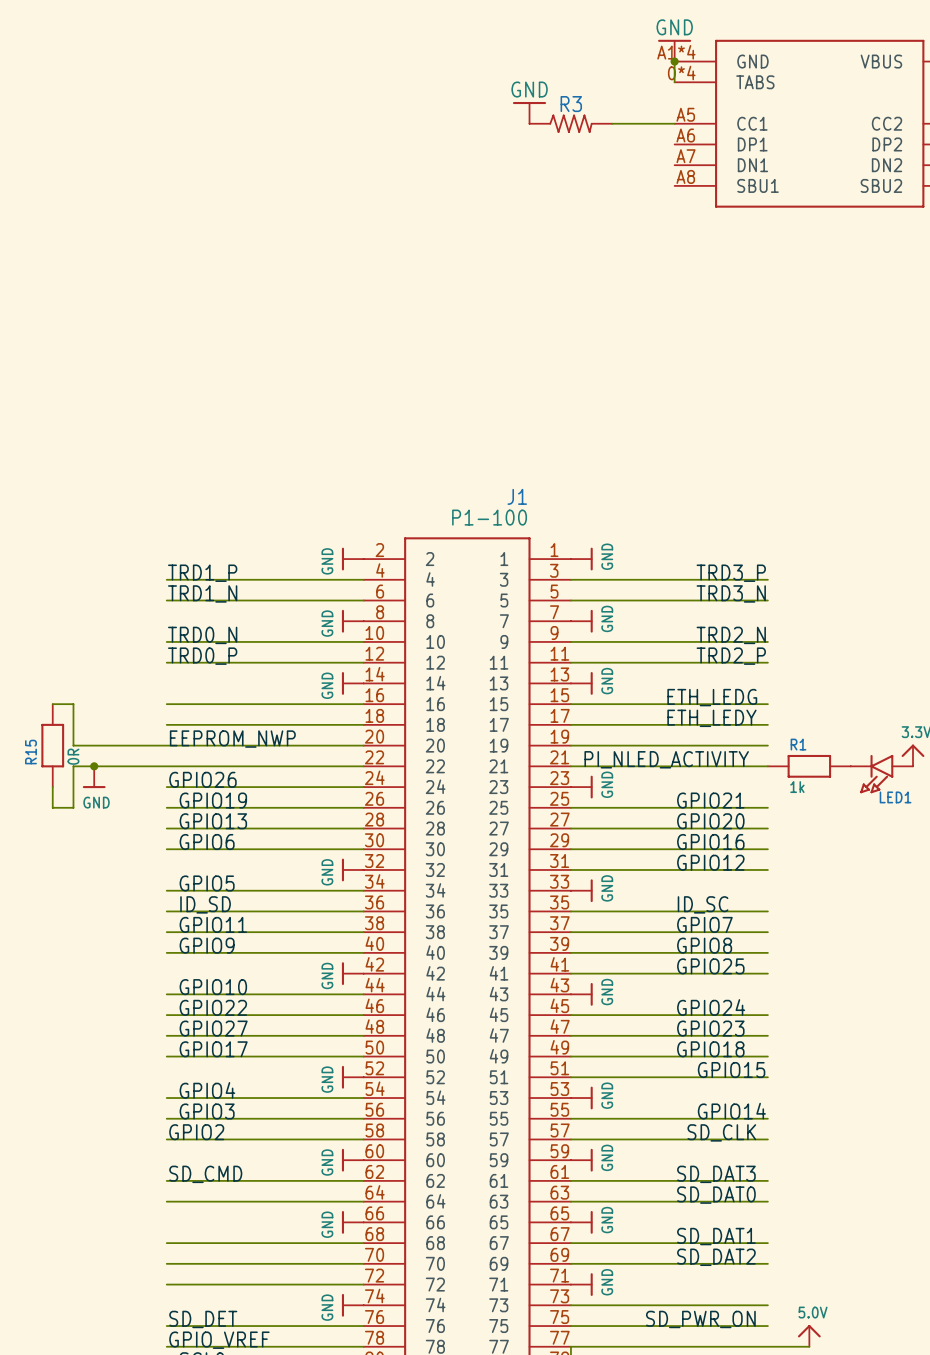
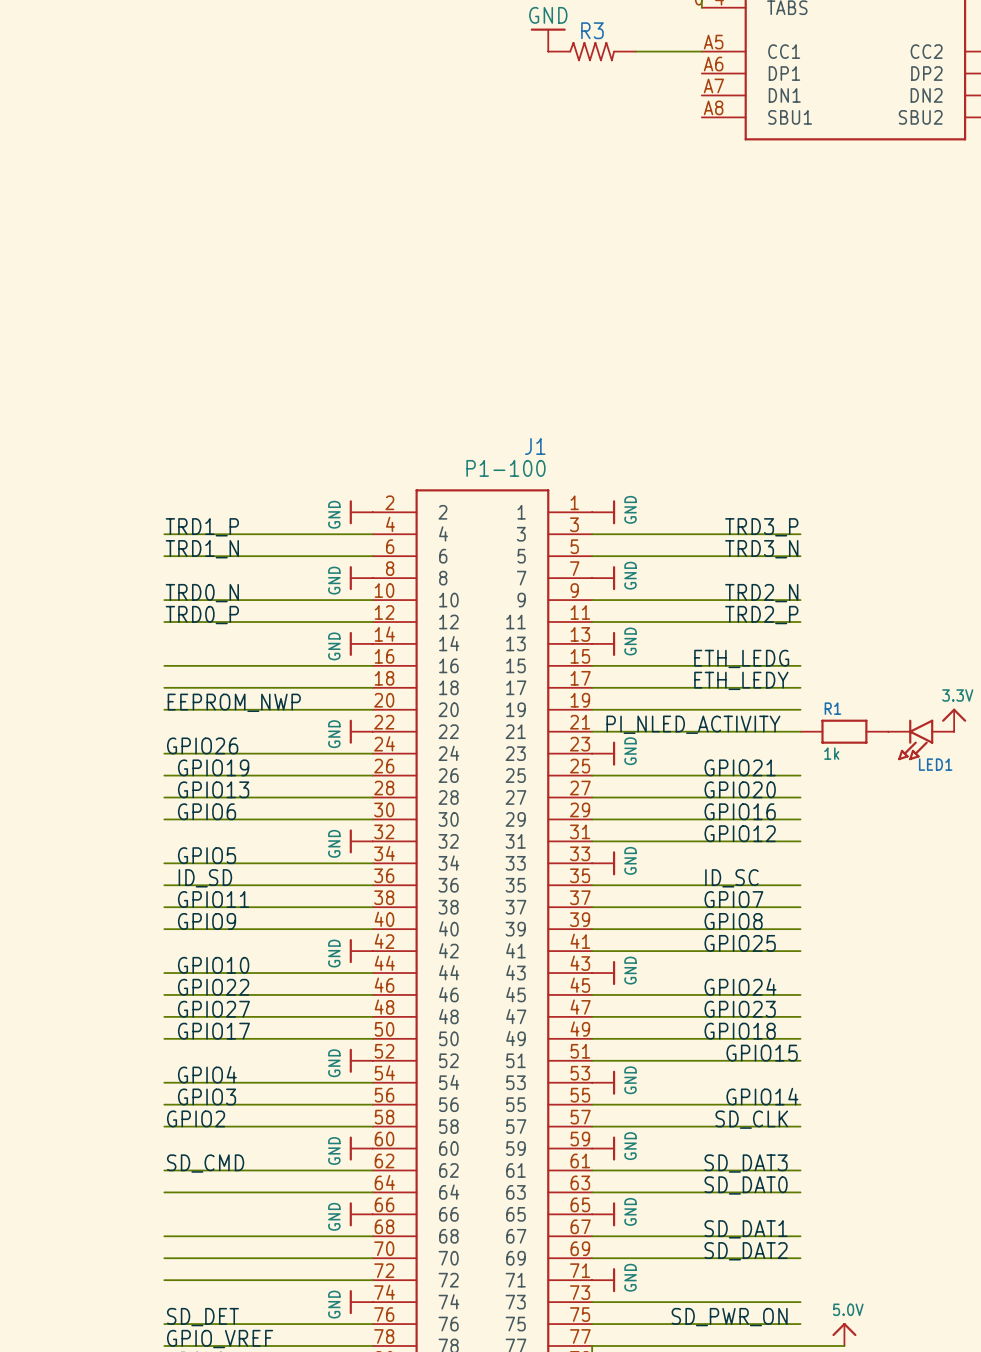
wire: (52, 704) (73, 704) (73, 745) (166, 745) -> none
R15: 0R (52, 745) -> none
junction: (94, 766) -> none
power symbol: none -> GND (361, 731)
wire: (363, 766) (73, 766) (73, 807) (52, 807) (52, 787) -> none
power symbol: GND (94, 777) -> none

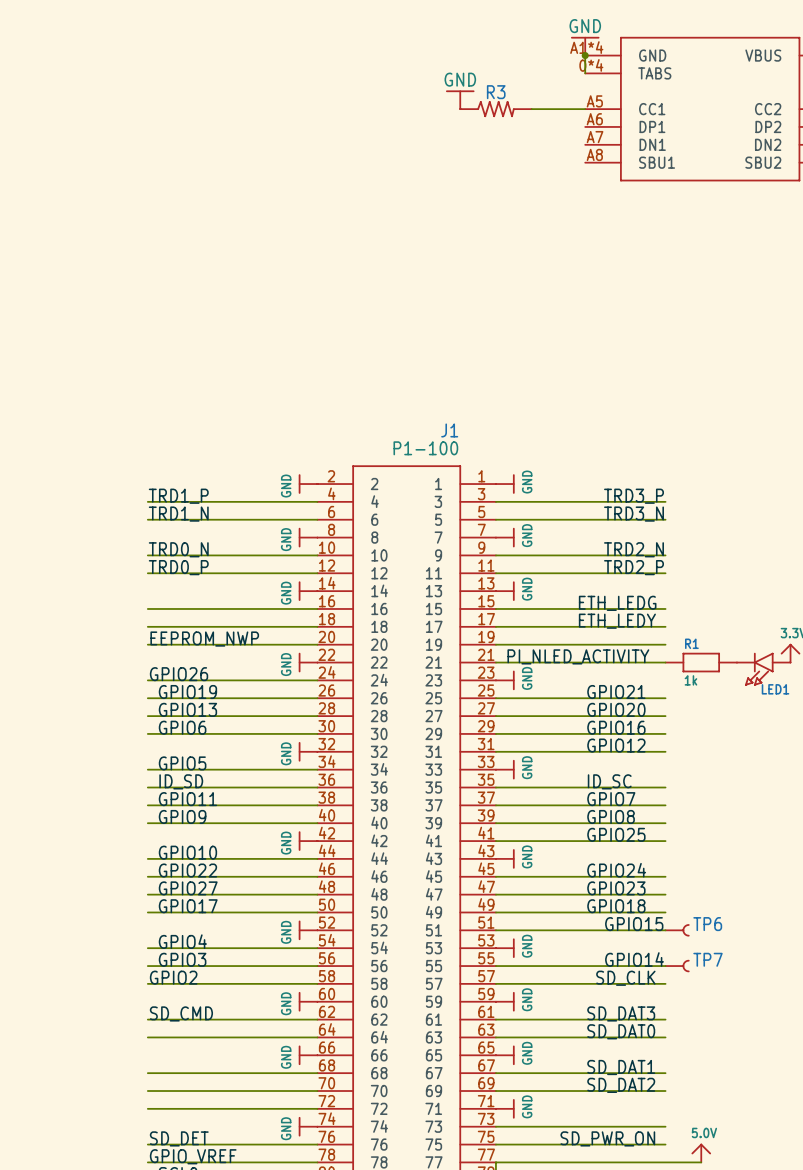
TP6: none -> (677, 930)
TP7: none -> (677, 966)

